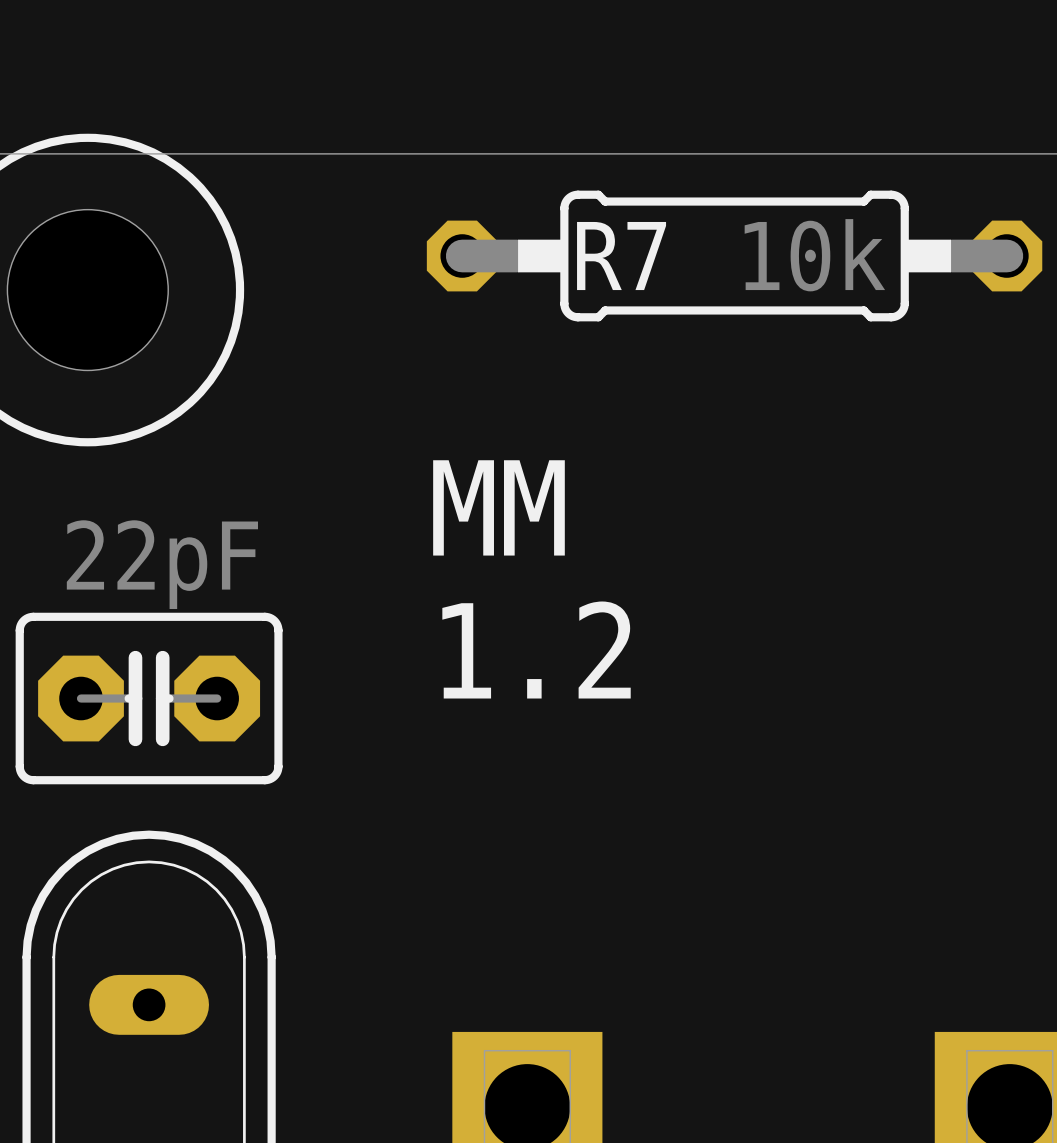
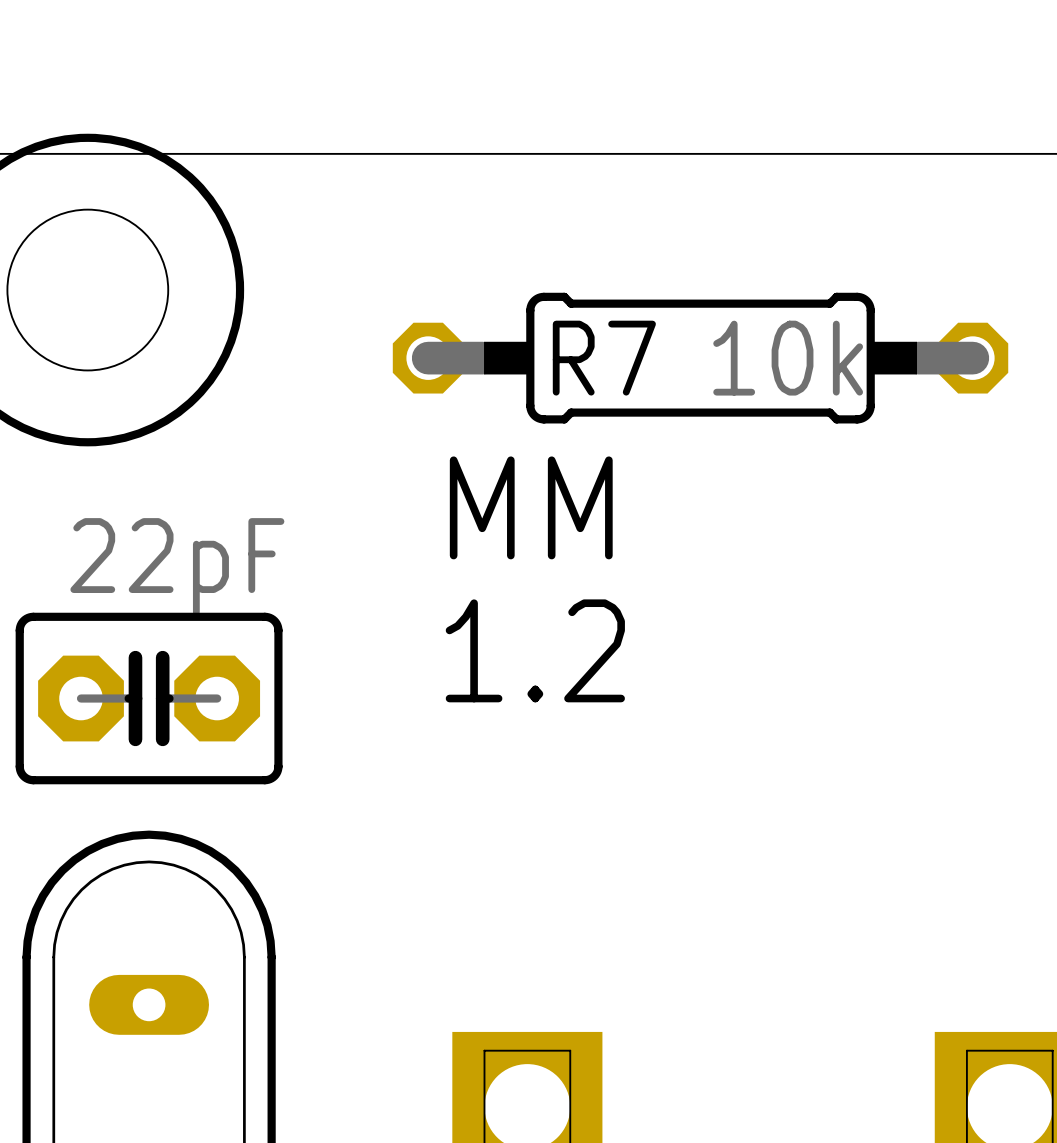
R7 position: (734, 256) -> (700, 358)

